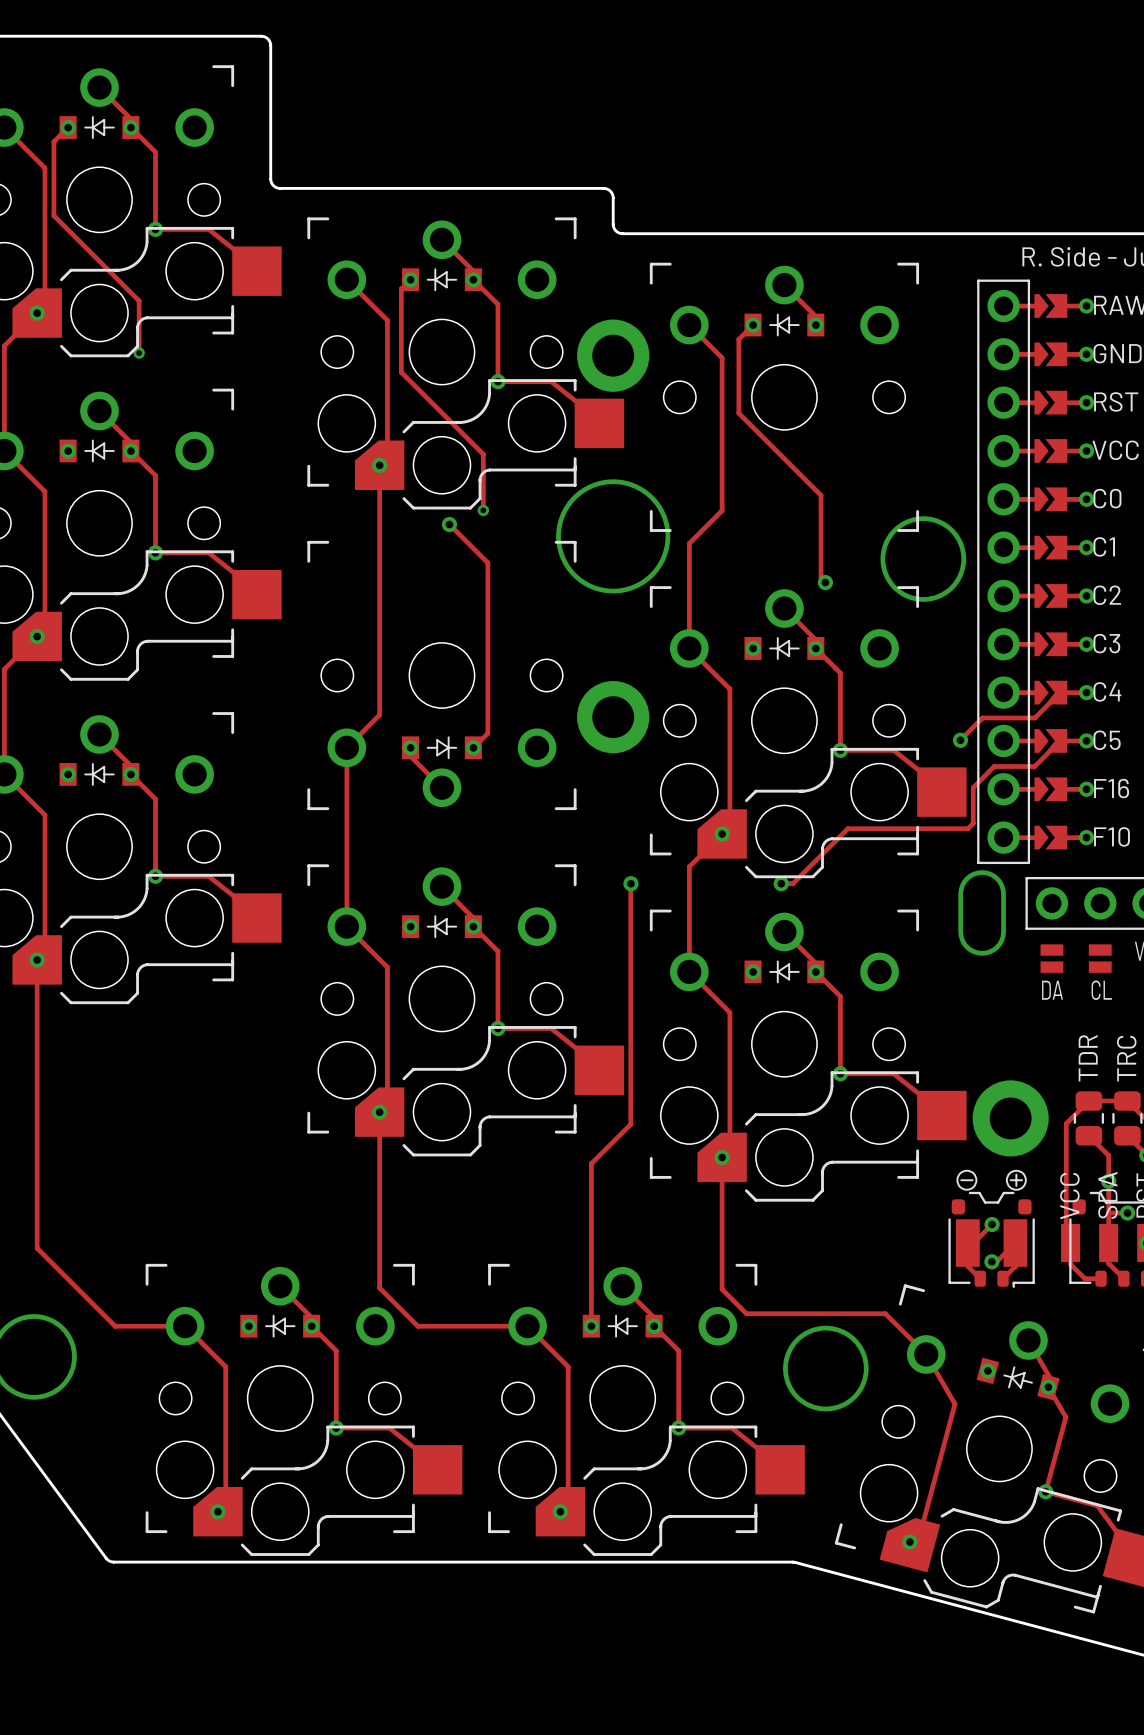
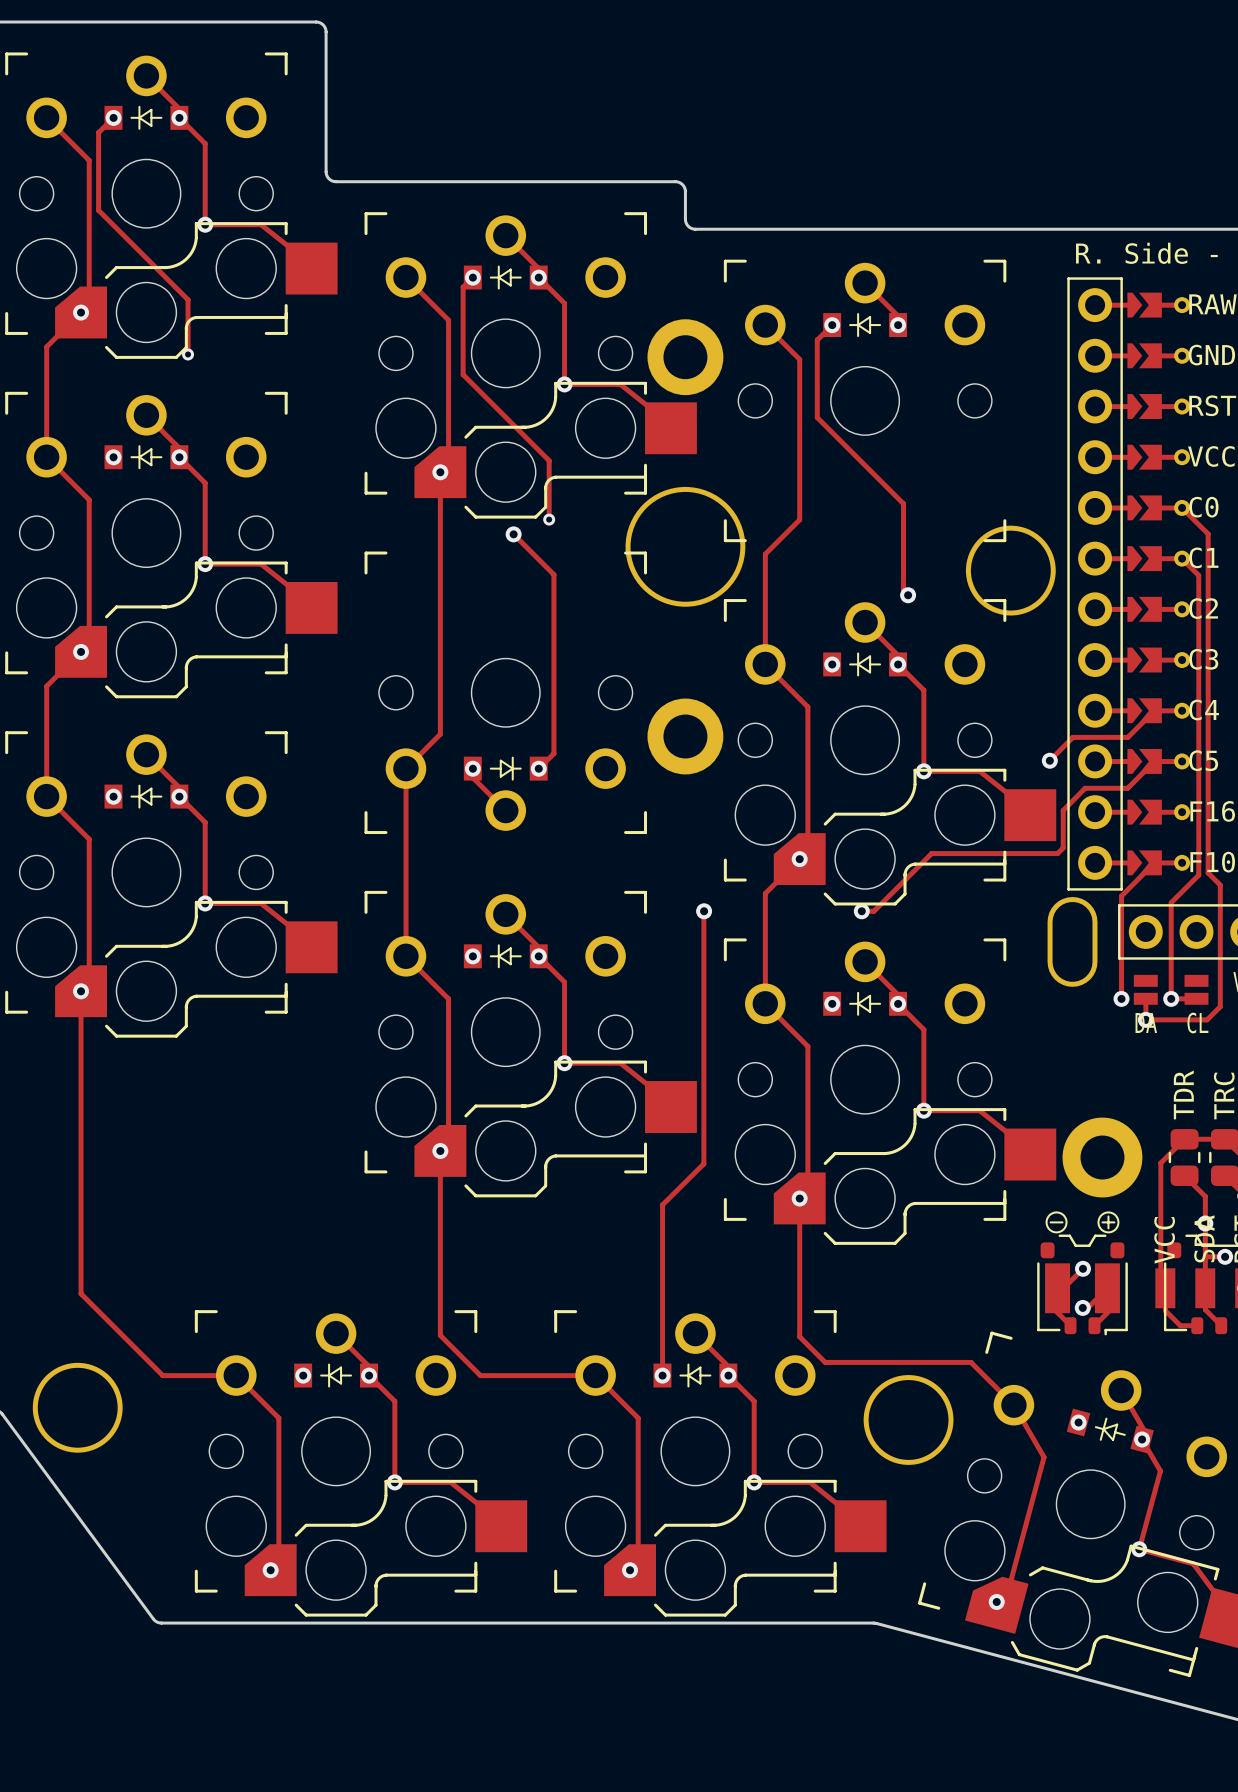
track: none -> (1182, 508) (1208, 533) (1208, 872) (1220, 885) (1220, 1006) (1207, 1019) (1145, 1019) (1145, 998)
track: none -> (1182, 558) (1198, 575) (1198, 875) (1171, 902) (1171, 998) (1196, 998)
track: none -> (1151, 865) (1121, 896) (1121, 998)
via: none -> (1121, 998)
via: none -> (1171, 998)
via: none -> (1145, 1019)

